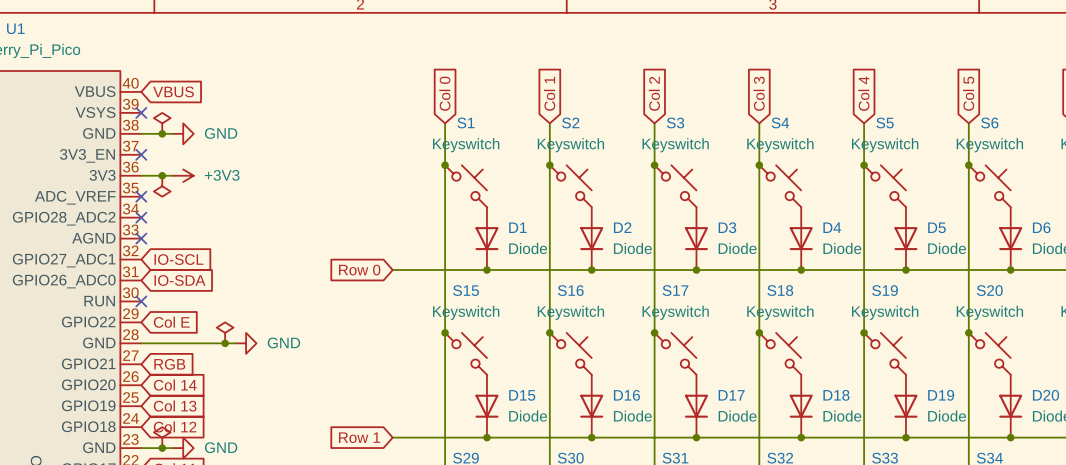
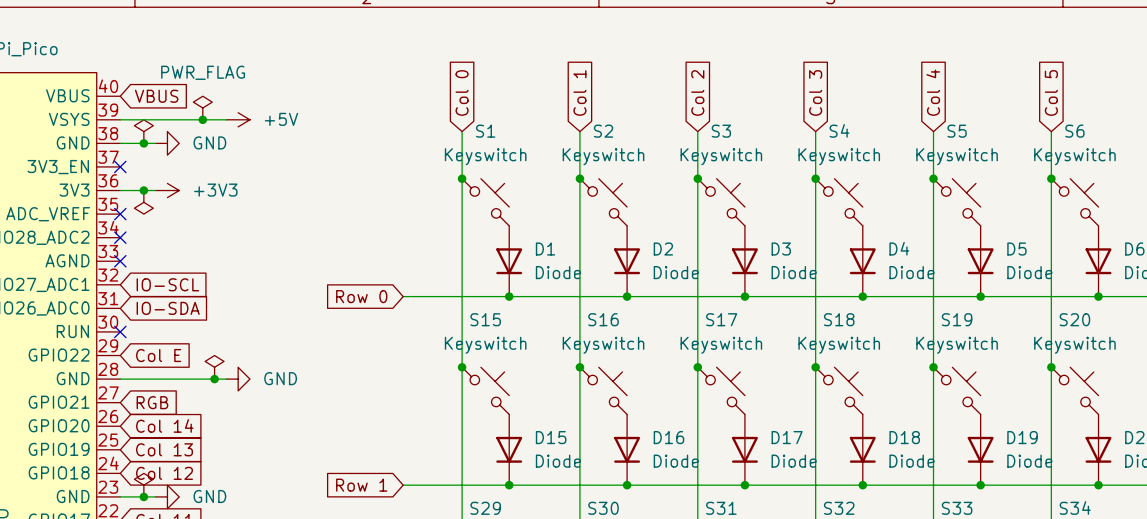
power symbol: none -> PWR_FLAG (202, 108)
wire: none -> (120, 119) (226, 119)
no-connect mark: (141, 112) -> none
junction: none -> (202, 119)
power symbol: none -> +5V (238, 119)

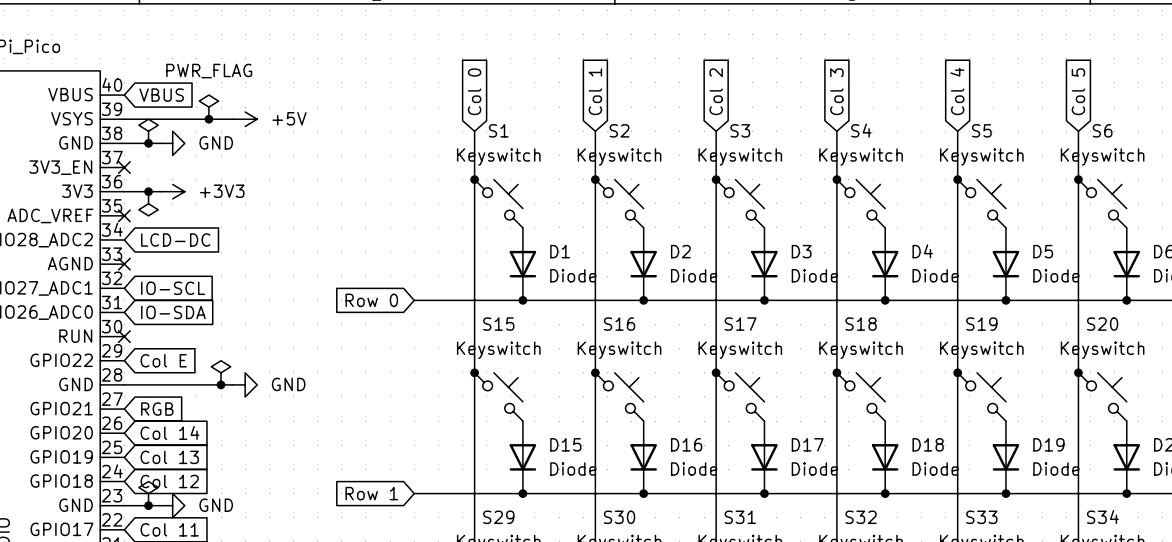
no-connect mark: (120, 237) -> none
global label: none -> LCD-DC (175, 239)

